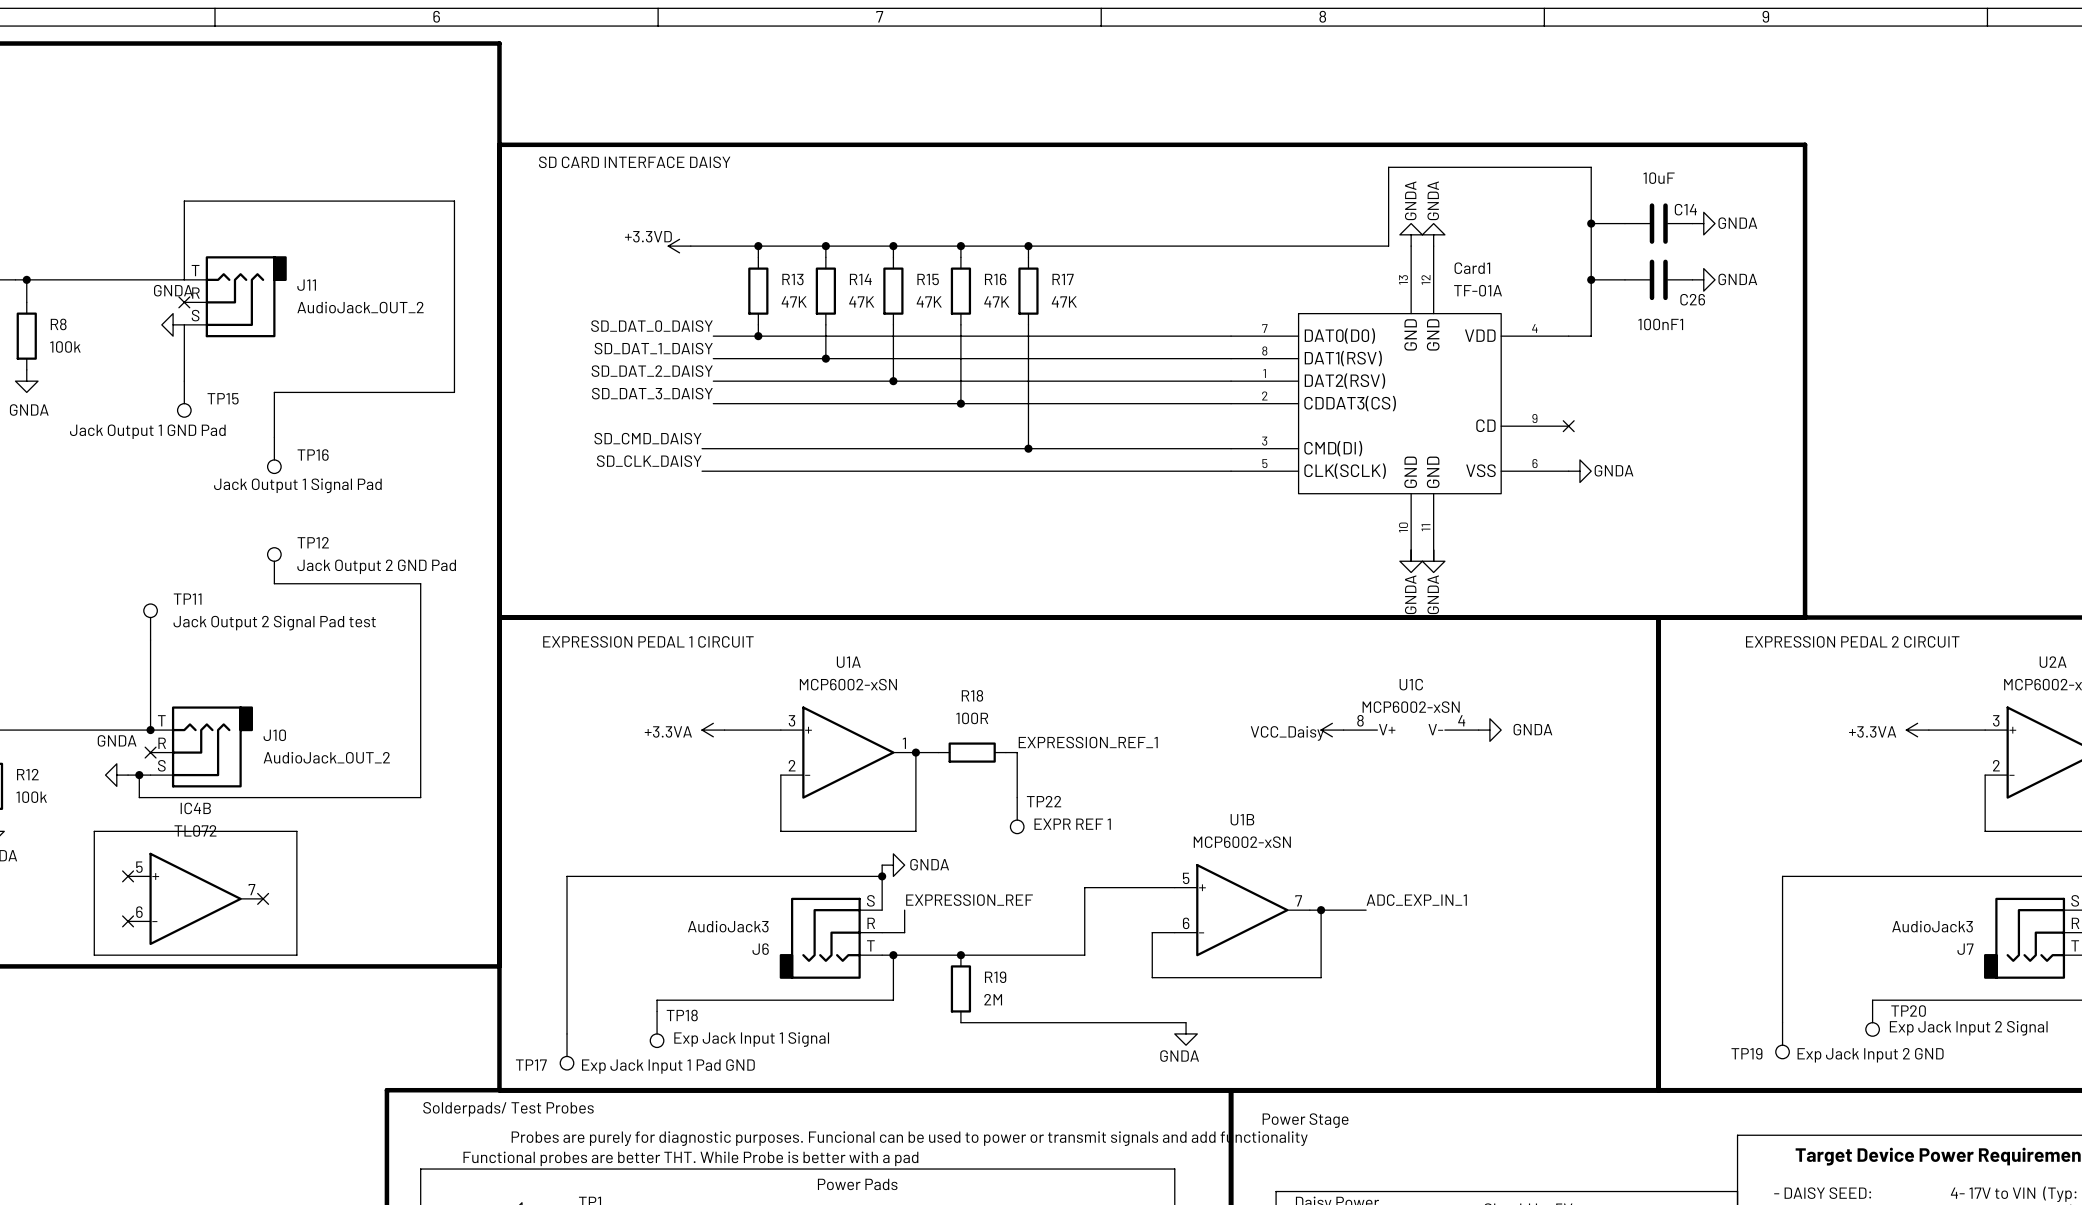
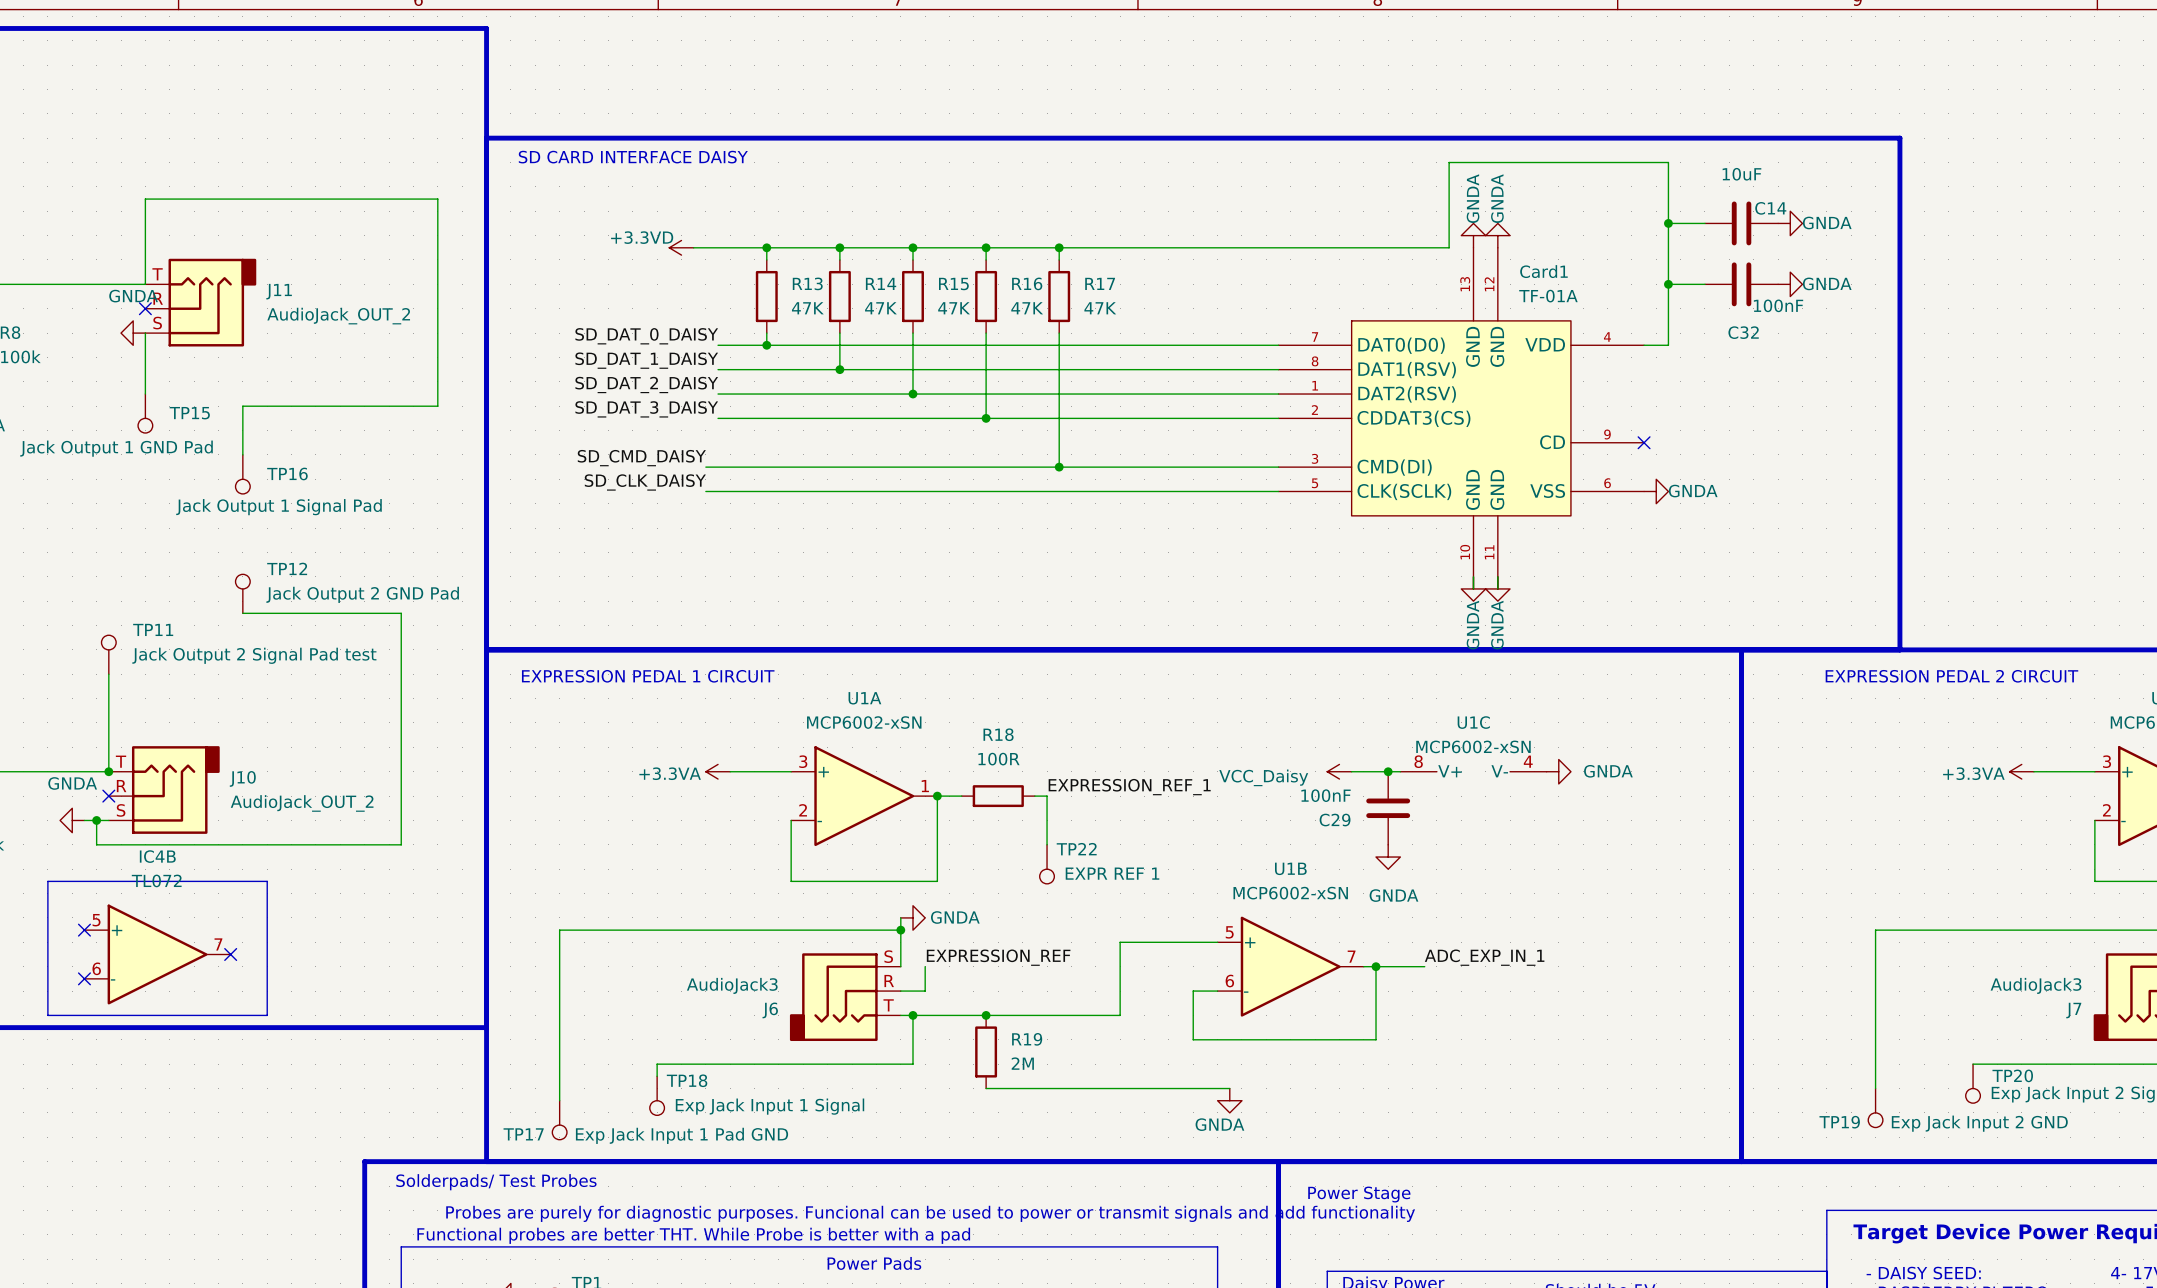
100nF1 value: C26 (1692, 299) -> 100nF (1778, 305)
100nF1 name: 100nF1 (1660, 324) -> C32 (1743, 332)
power symbol position: VCC_Daisy (1332, 730) -> VCC_Daisy (1339, 771)
junction: none -> (1388, 771)
power symbol text position: VCC_Daisy (1287, 733) -> VCC_Daisy (1263, 777)
C29: none -> 100nF (1388, 808)
power symbol: none -> GNDA (1388, 857)

